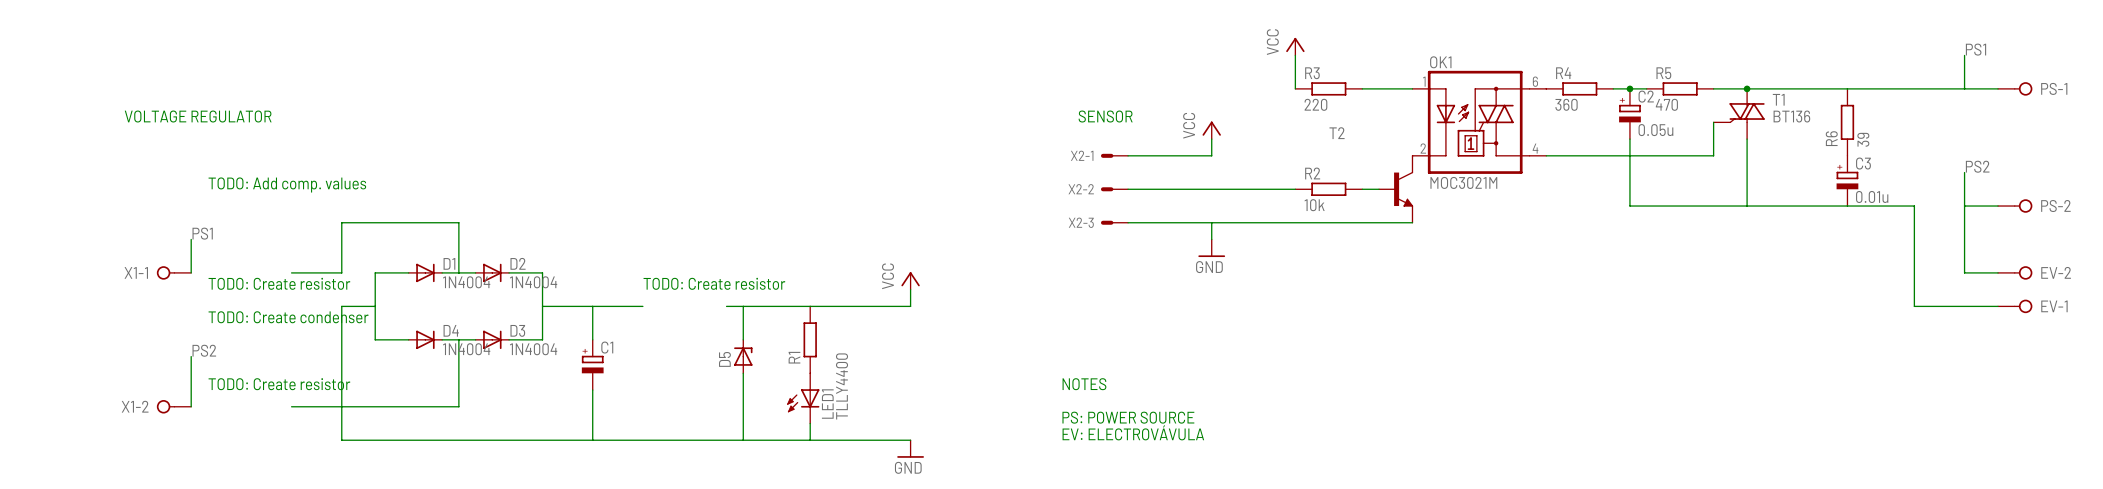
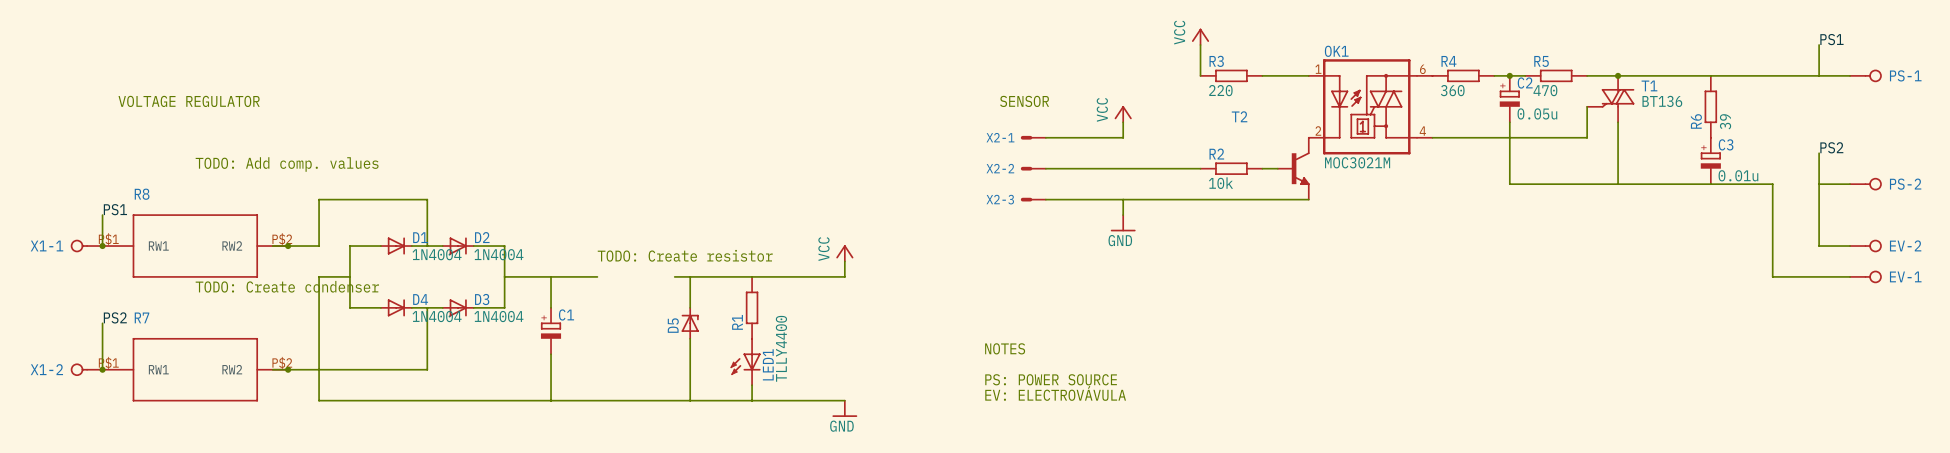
label position: PS1 (202, 233) -> PS1 (115, 209)
wire: (191, 239) (191, 272) -> (102, 215) (102, 246)
junction: none -> (102, 246)
X1-1 position: (174, 272) -> (86, 246)
R8: none -> (195, 246)
junction: none -> (288, 246)
text: TODO: Create resistor (279, 283) -> none
label position: PS2 (204, 350) -> PS2 (115, 317)
wire: (191, 356) (191, 406) -> (102, 323) (102, 369)
text: TODO: Create resistor (279, 384) -> none
junction: none -> (102, 369)
X1-2 position: (174, 406) -> (86, 369)
R7: none -> (195, 369)
junction: none -> (288, 369)

